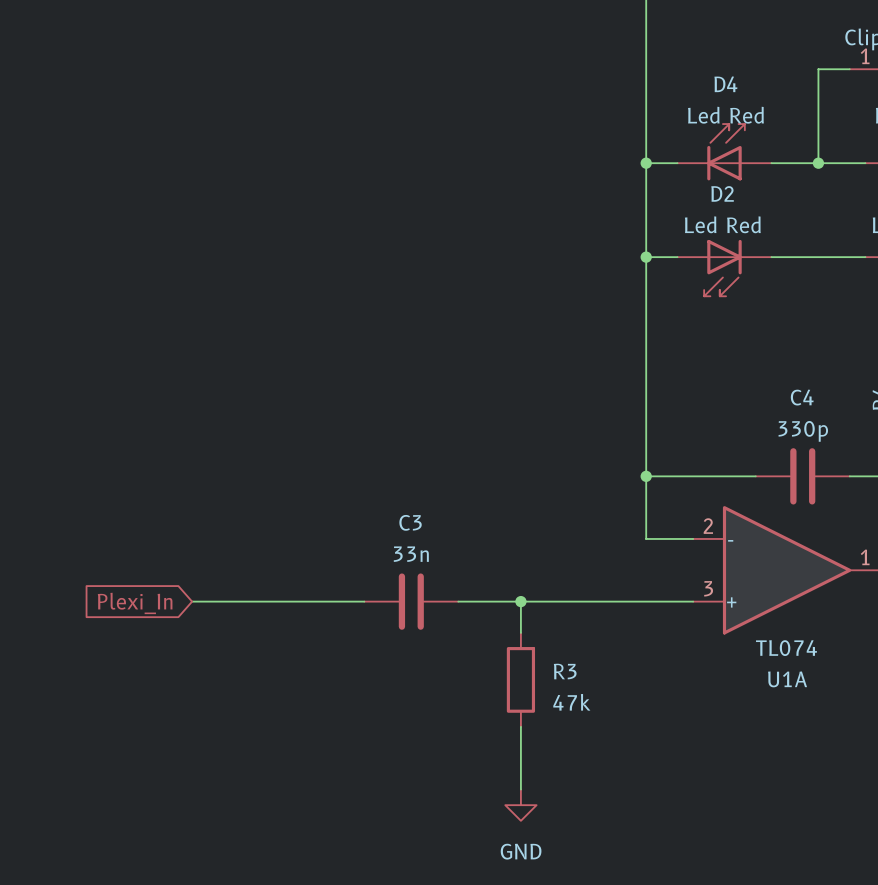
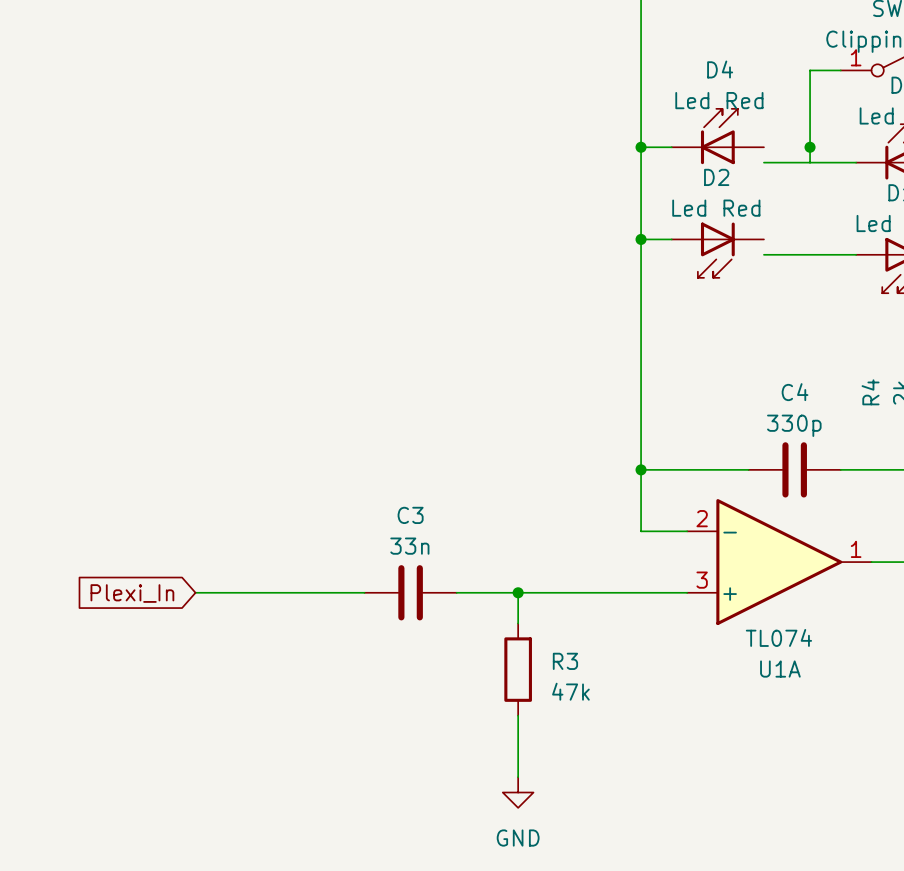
D4 position: (724, 152) -> (717, 136)
wire: (646, 163) (677, 163) -> (641, 147) (671, 147)
junction position: (646, 163) -> (641, 147)
junction position: (818, 163) -> (810, 147)
wire: (646, 257) (677, 257) -> (641, 239) (671, 239)
junction position: (646, 257) -> (641, 239)
D2 position: (724, 268) -> (717, 250)

